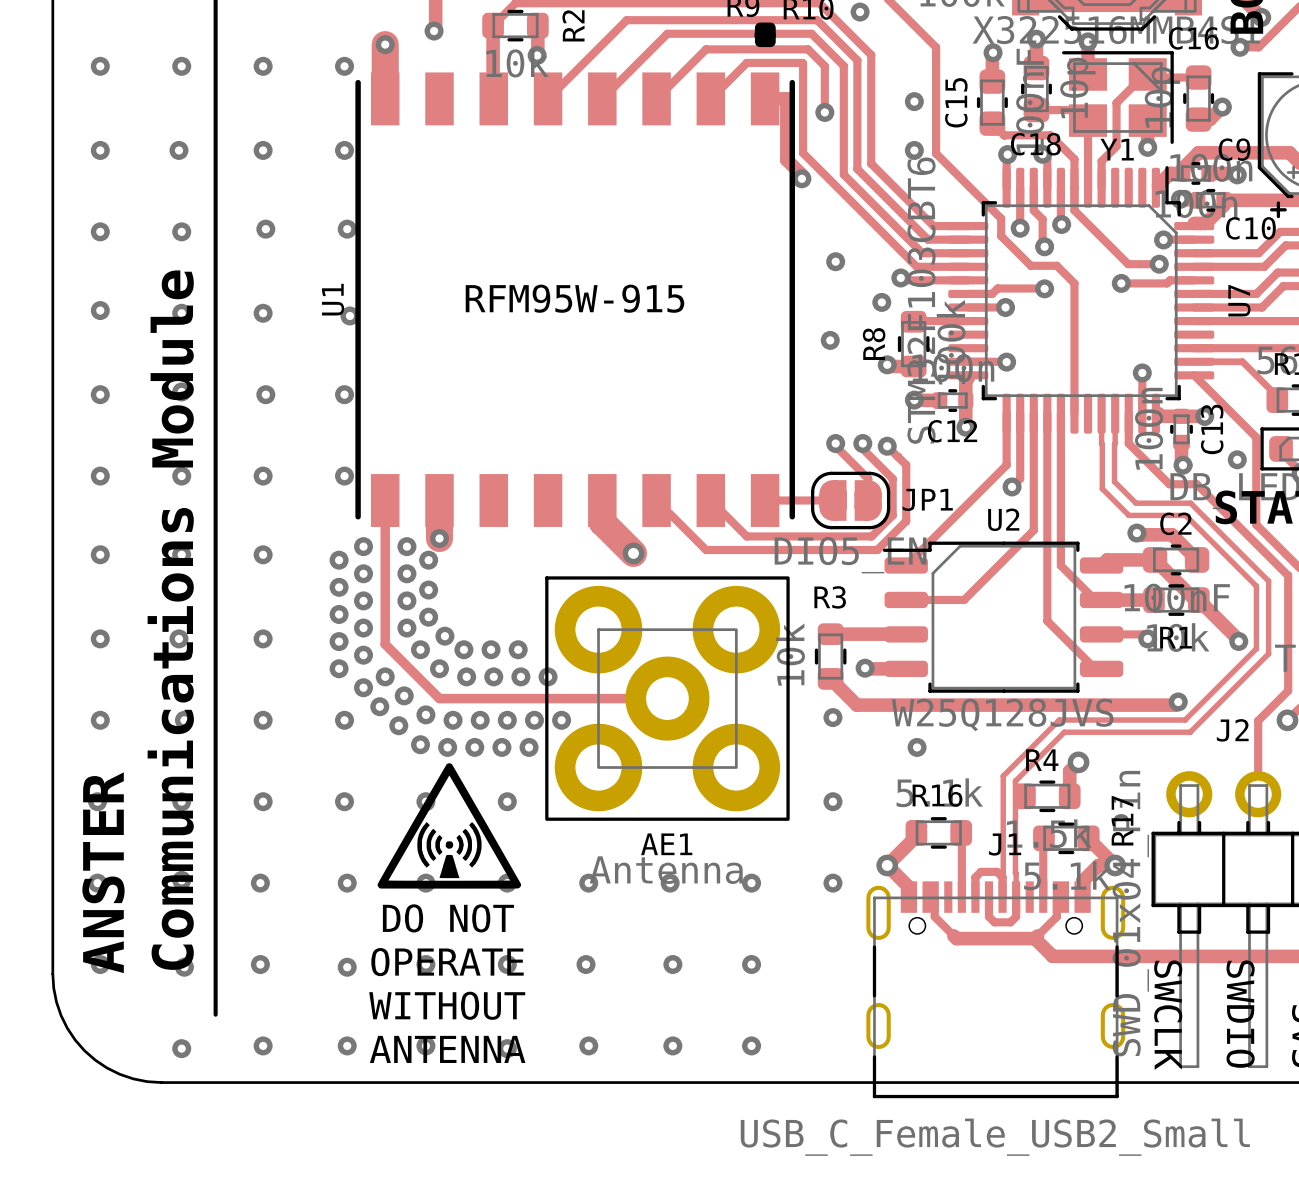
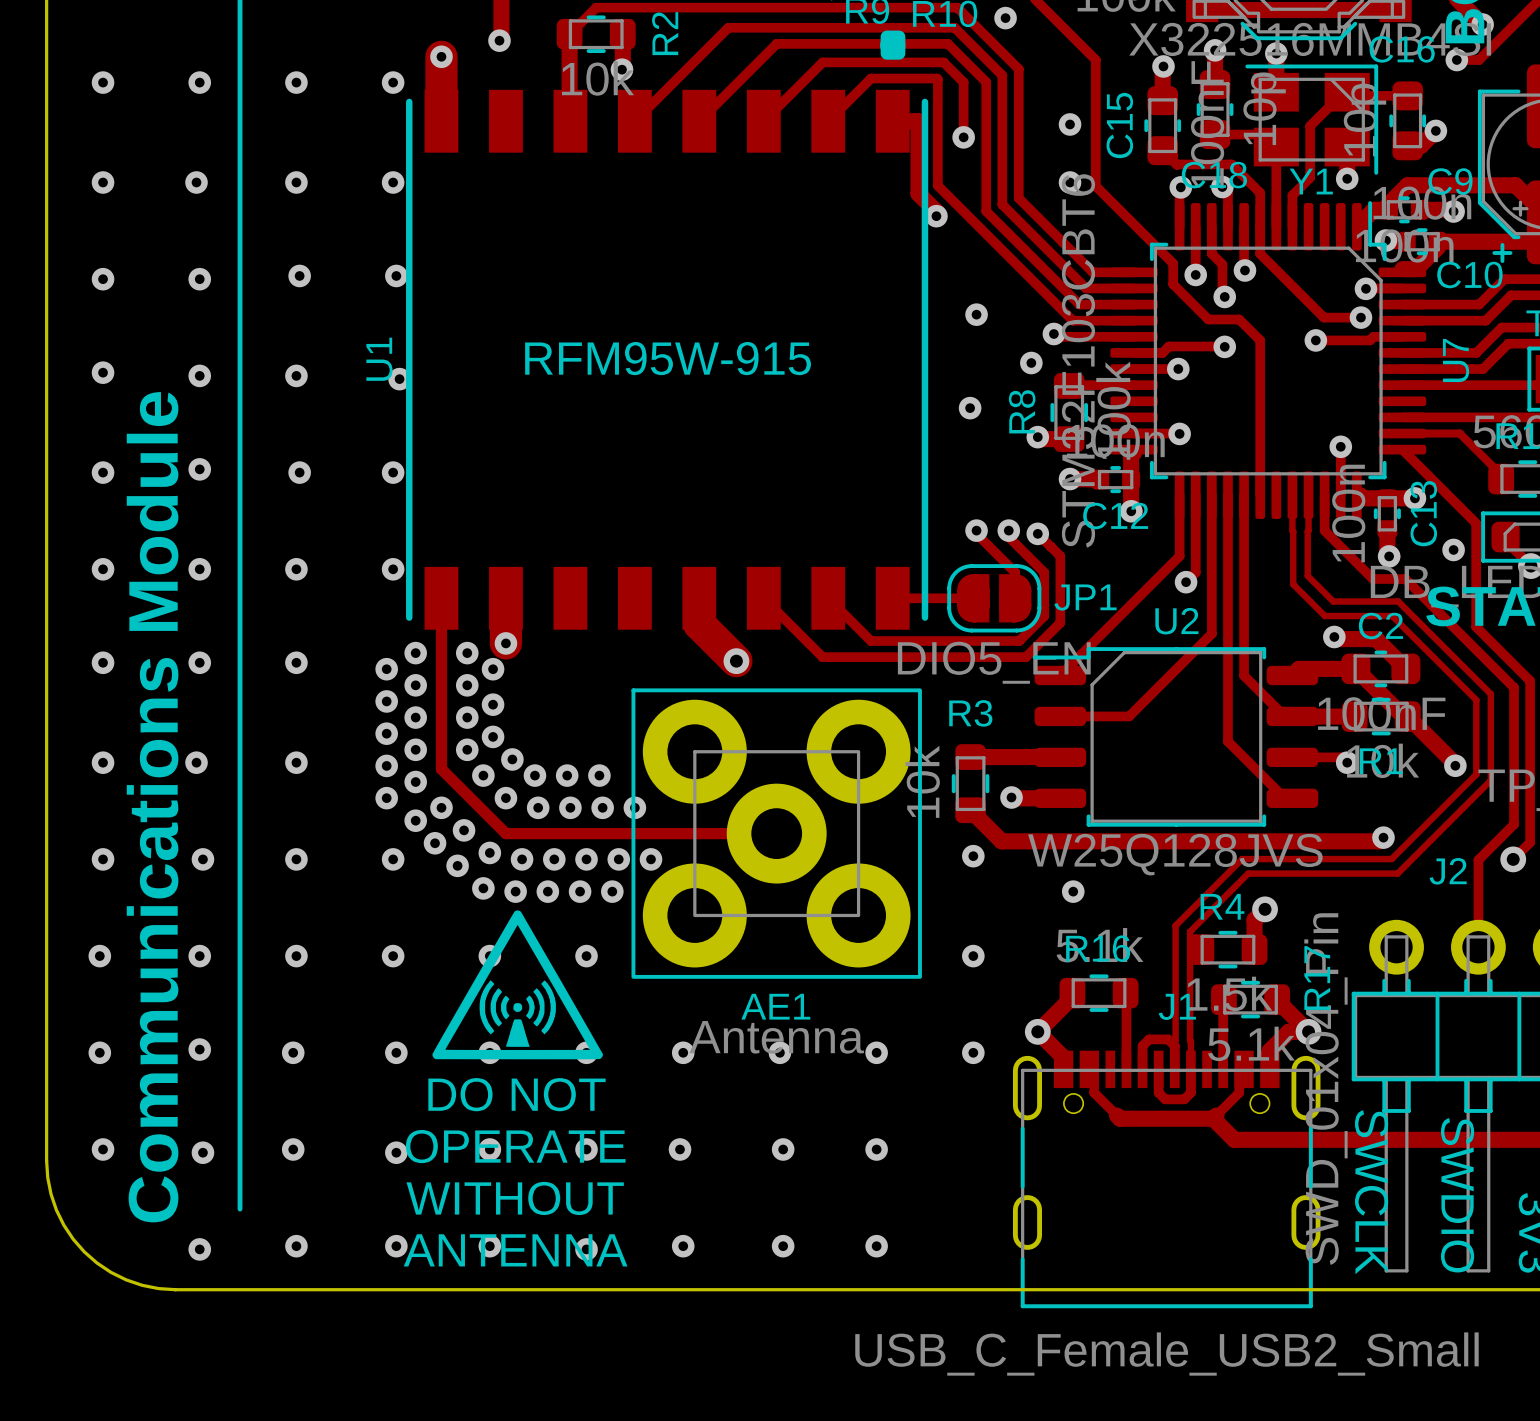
text position: Communications Module (170, 620) -> Communications Module (152, 807)
text: ANSTER (103, 872) -> none

